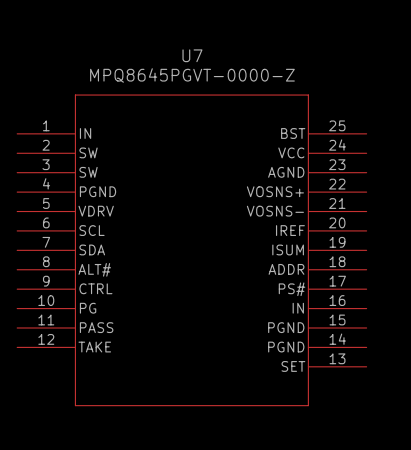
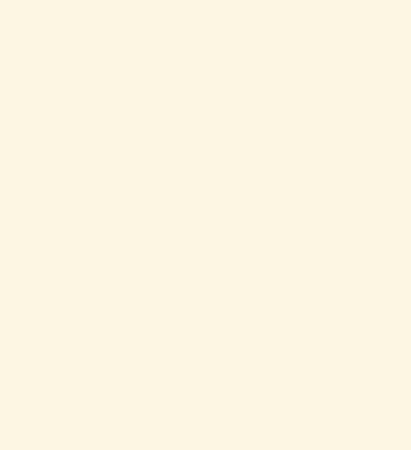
U7: MPQ8645PGVT-0000-Z (191, 250) -> none

